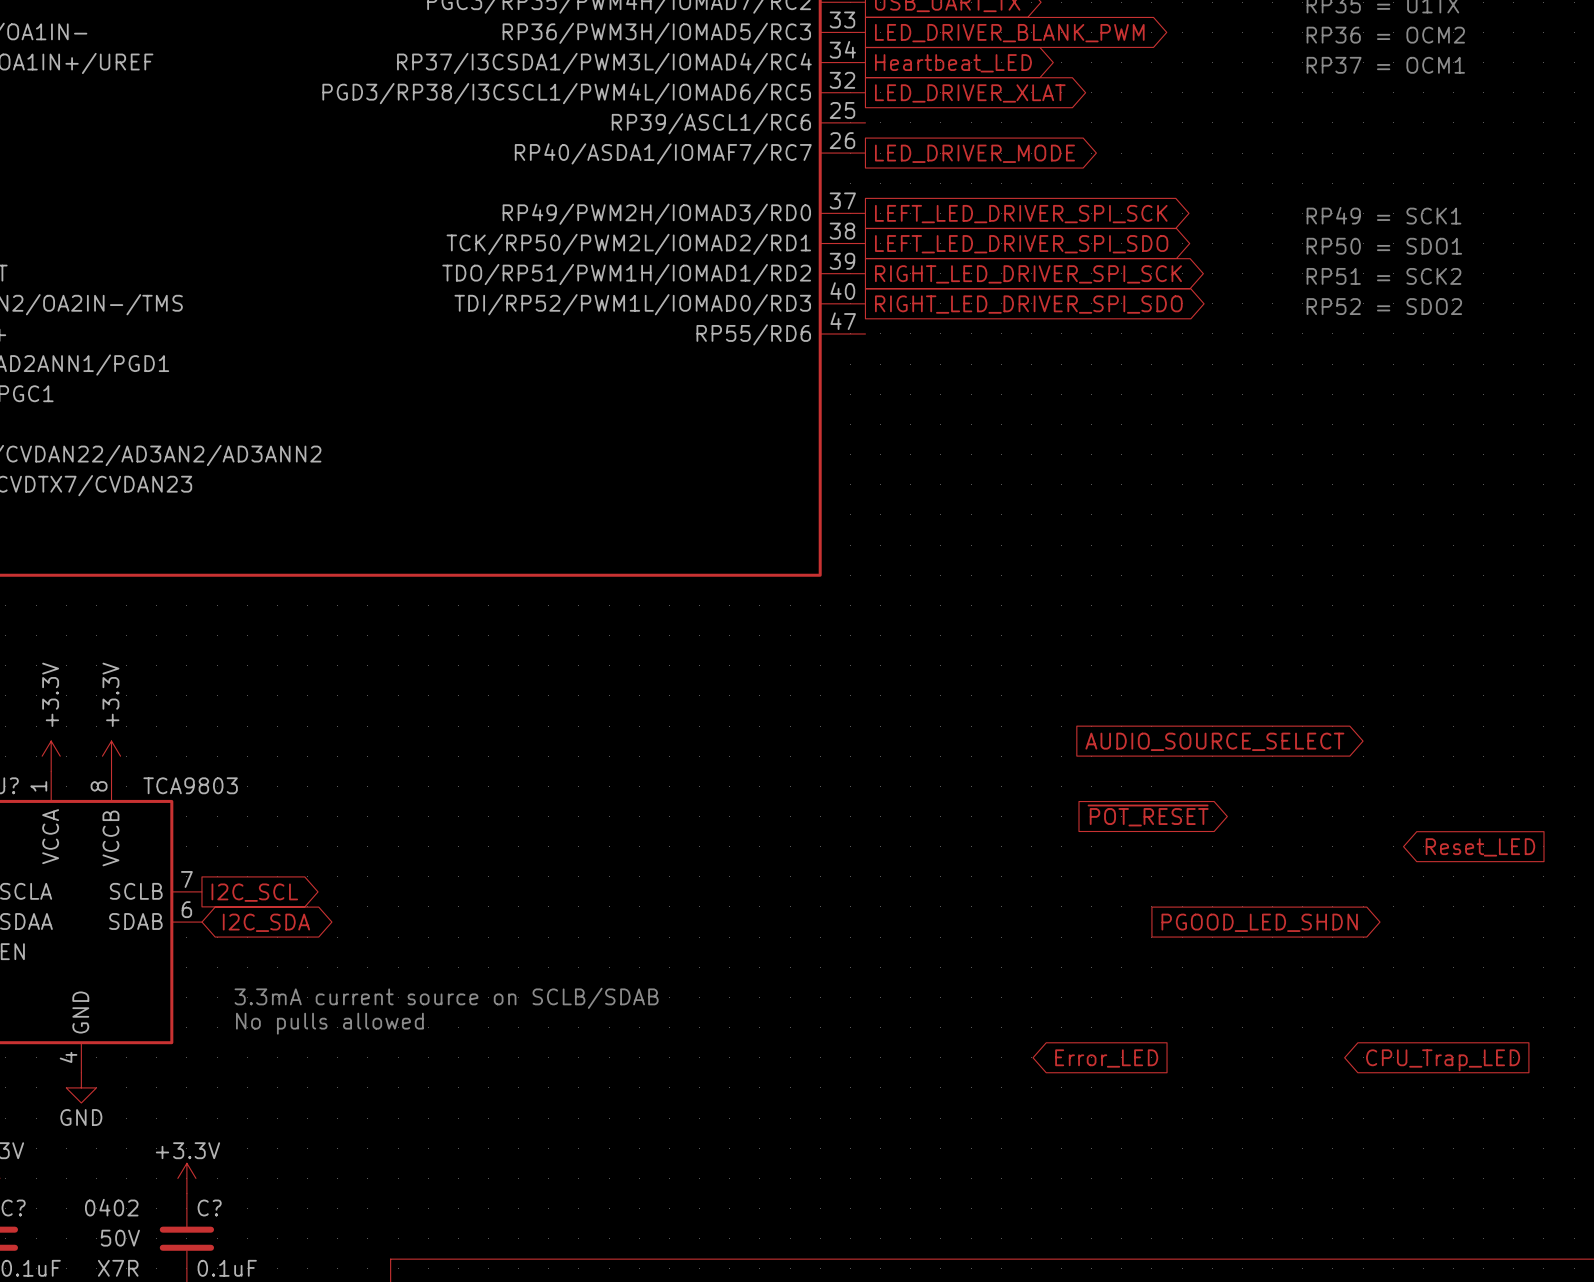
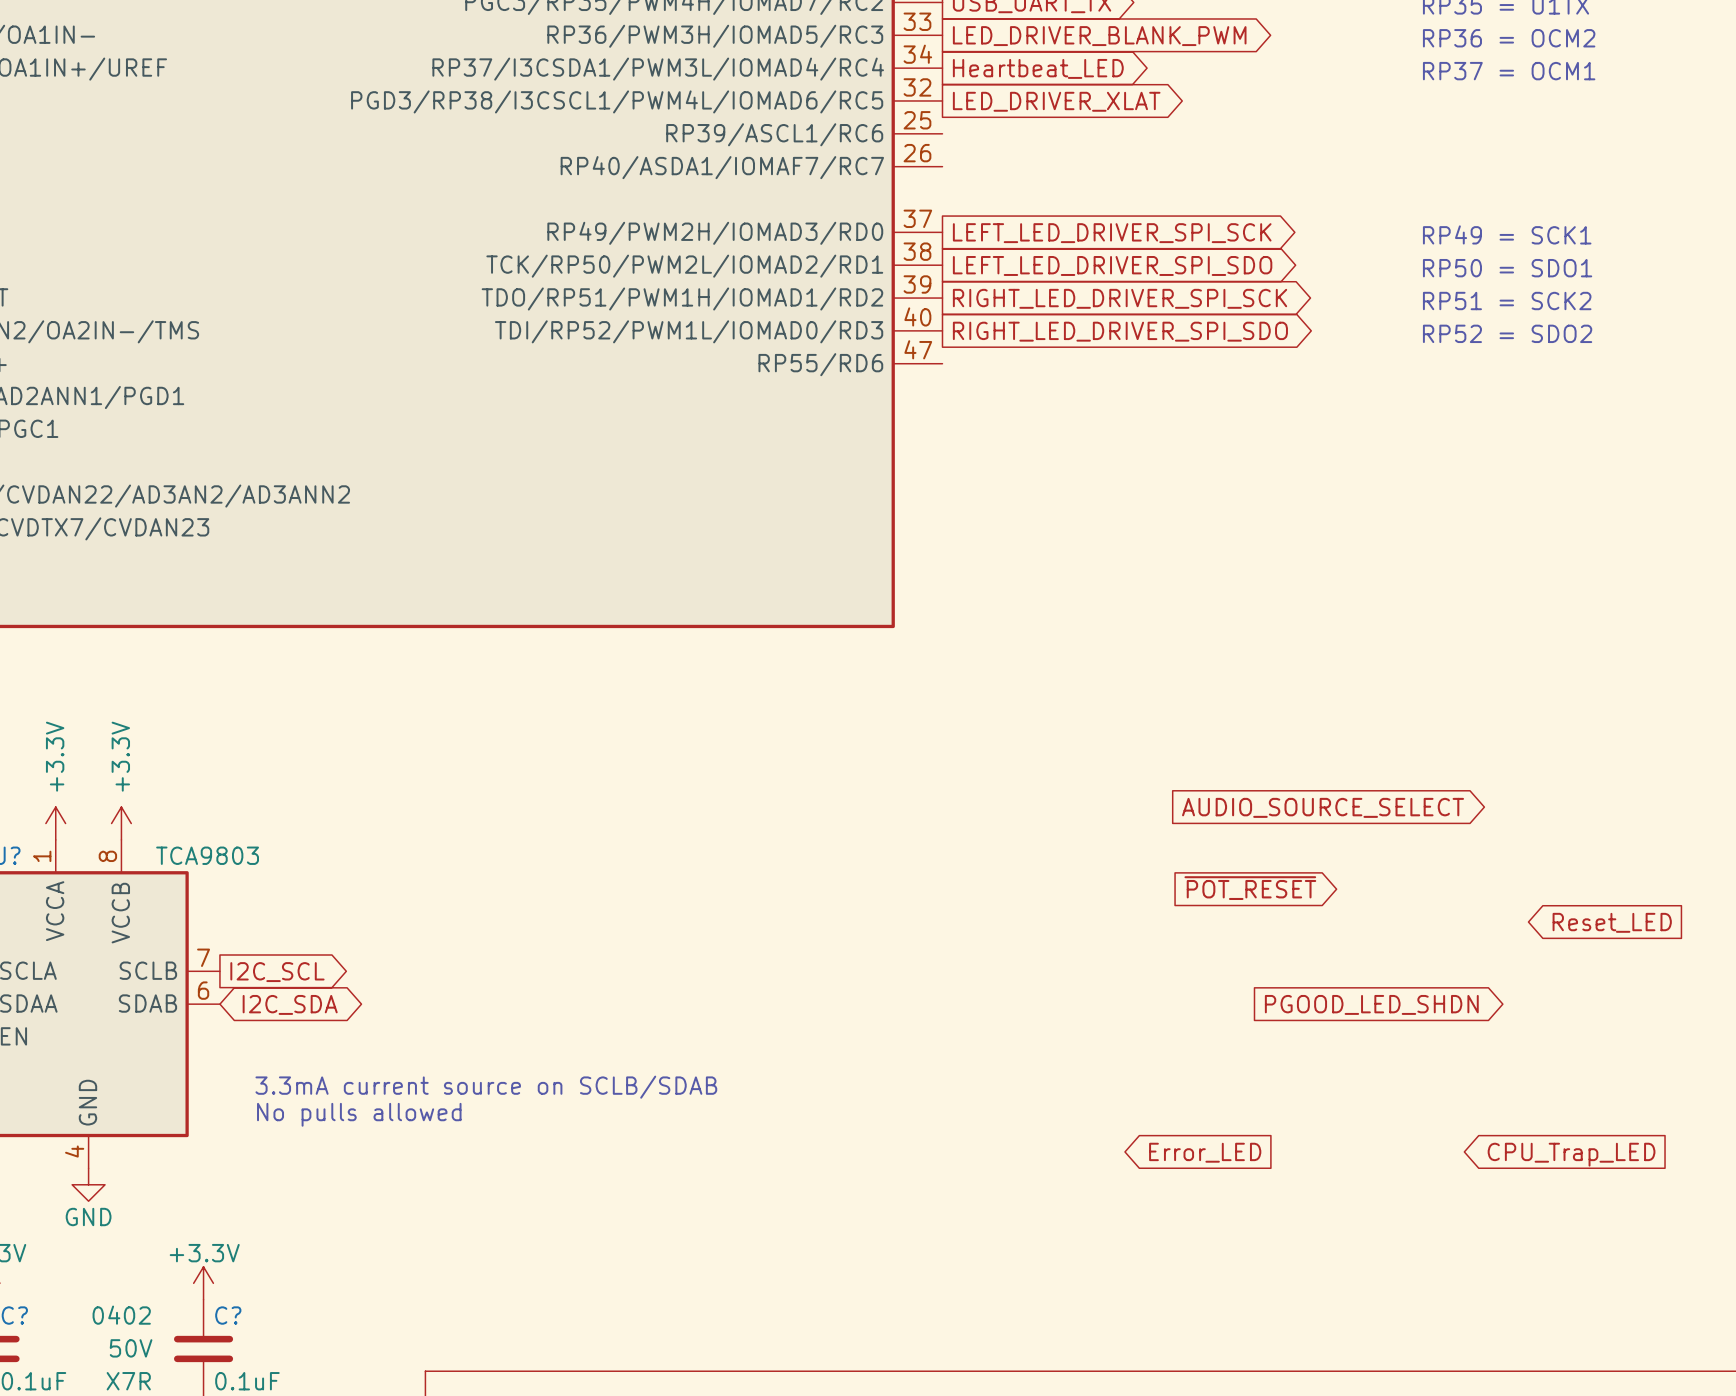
global label: LED_DRIVER_MODE (974, 153) -> none

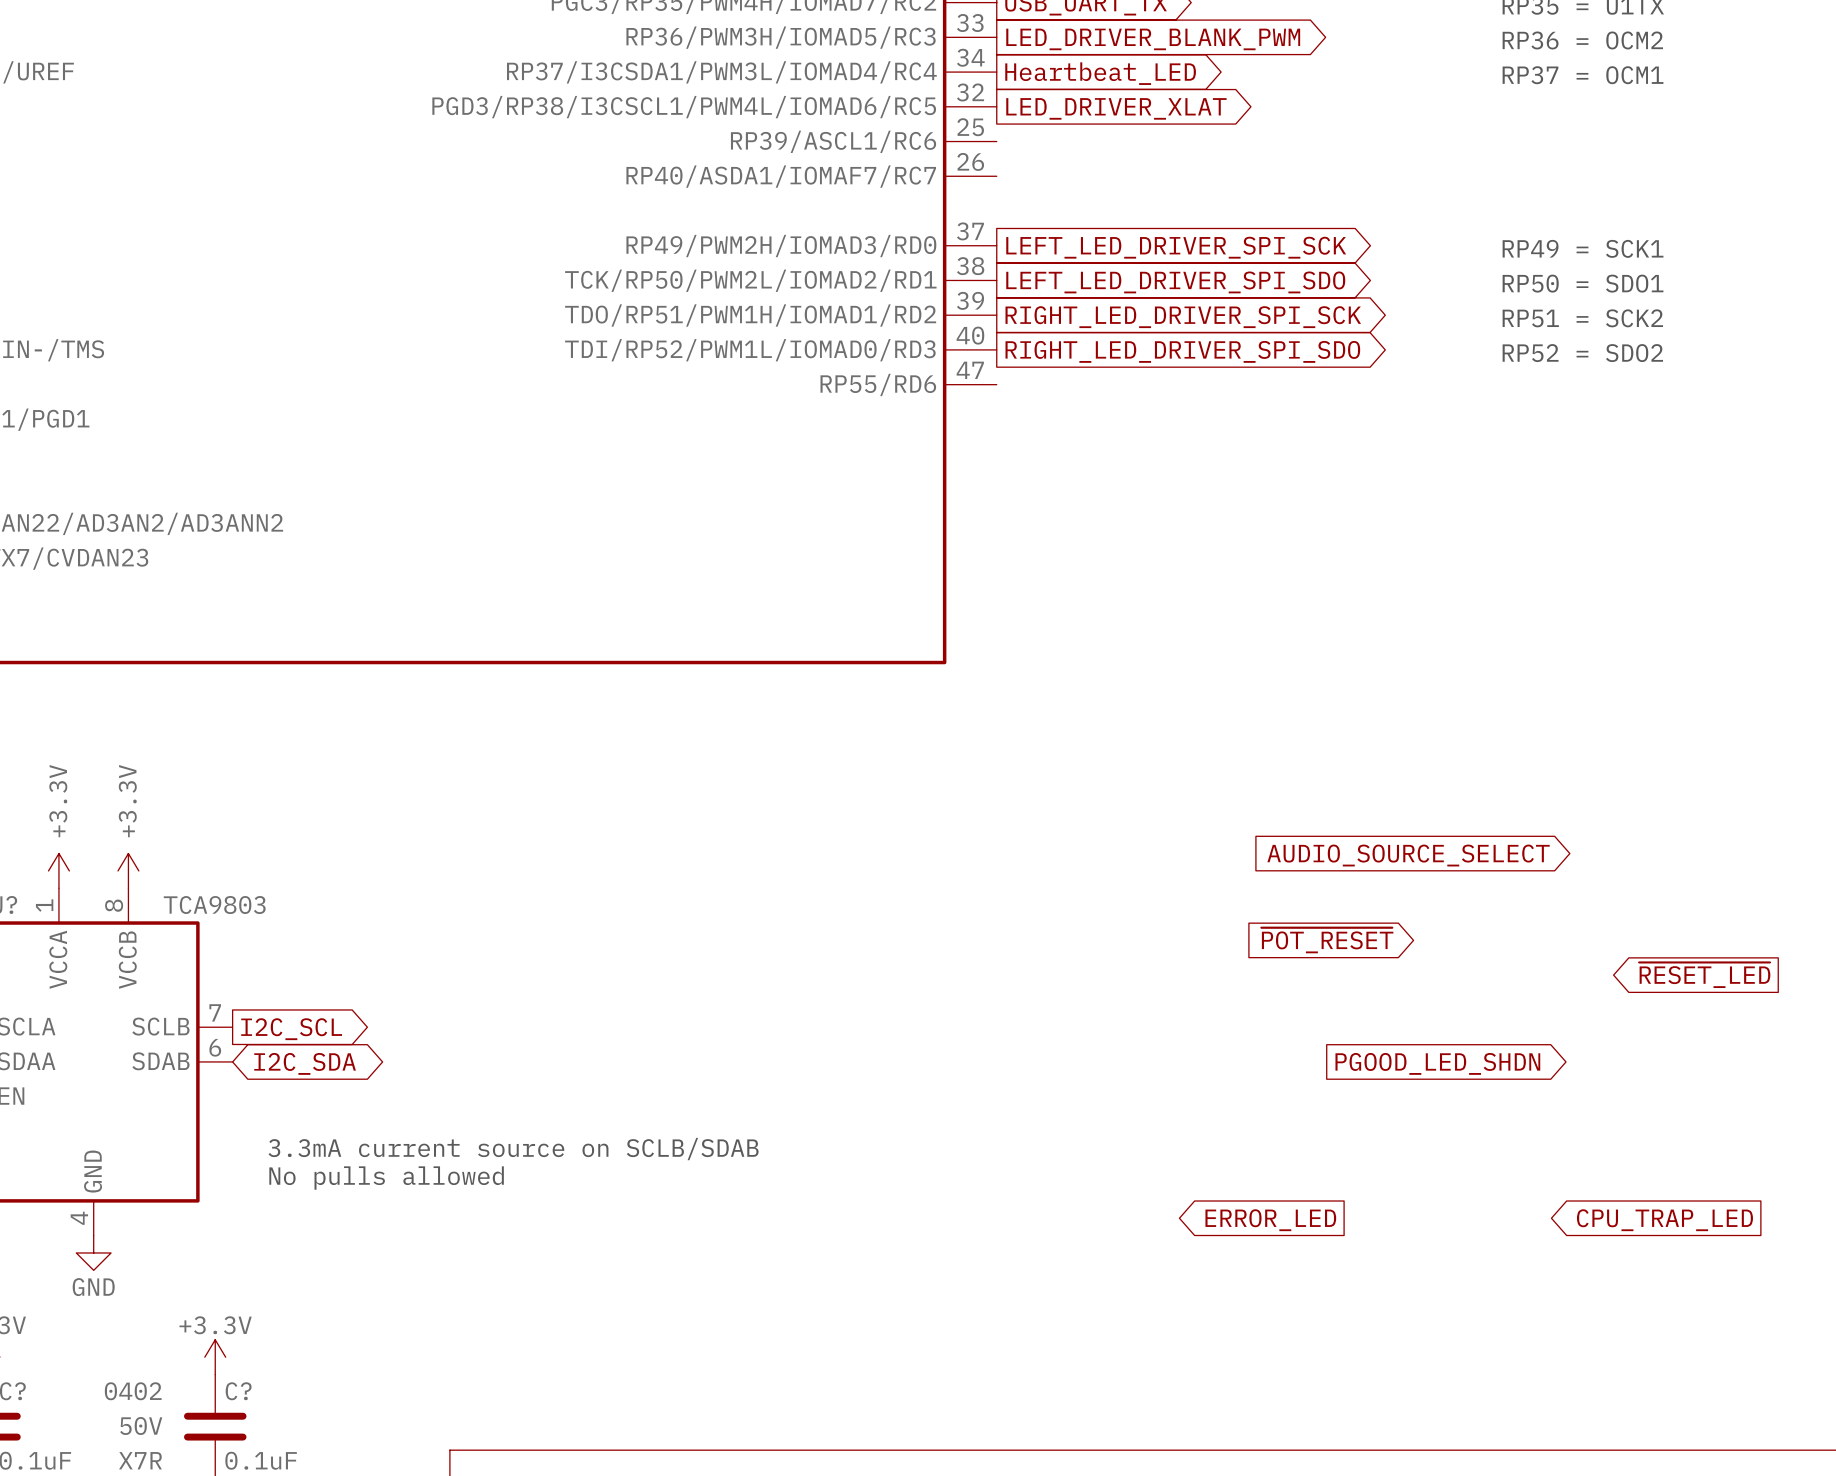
global label: Reset_LED (1612, 922) -> ~{RESET_LED} (1704, 975)
global label: Error_LED (1205, 1152) -> ERROR_LED (1270, 1220)
global label: CPU_Trap_LED (1571, 1154) -> CPU_TRAP_LED (1664, 1220)

